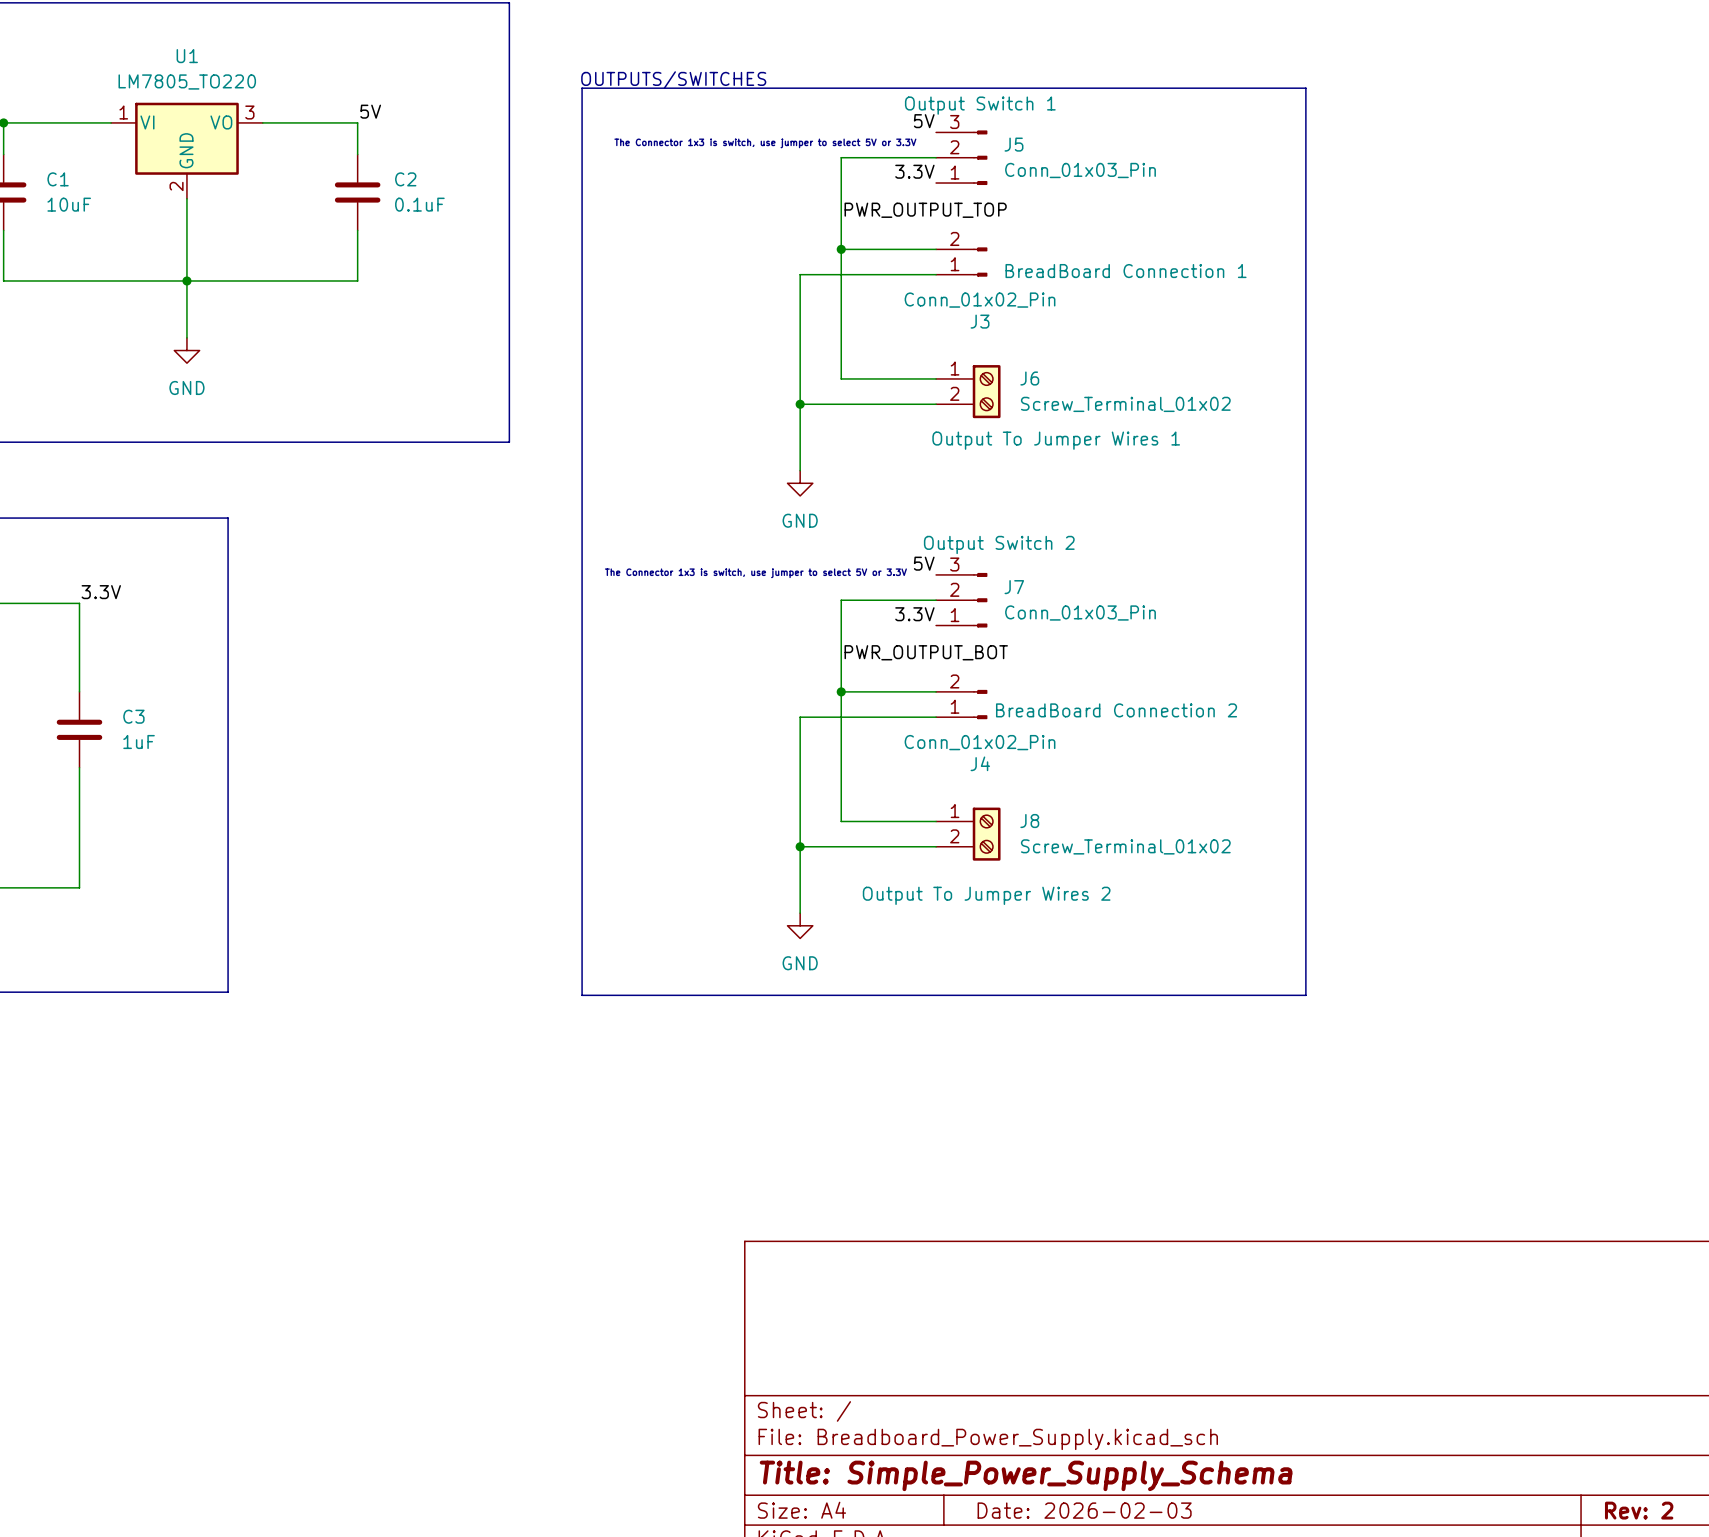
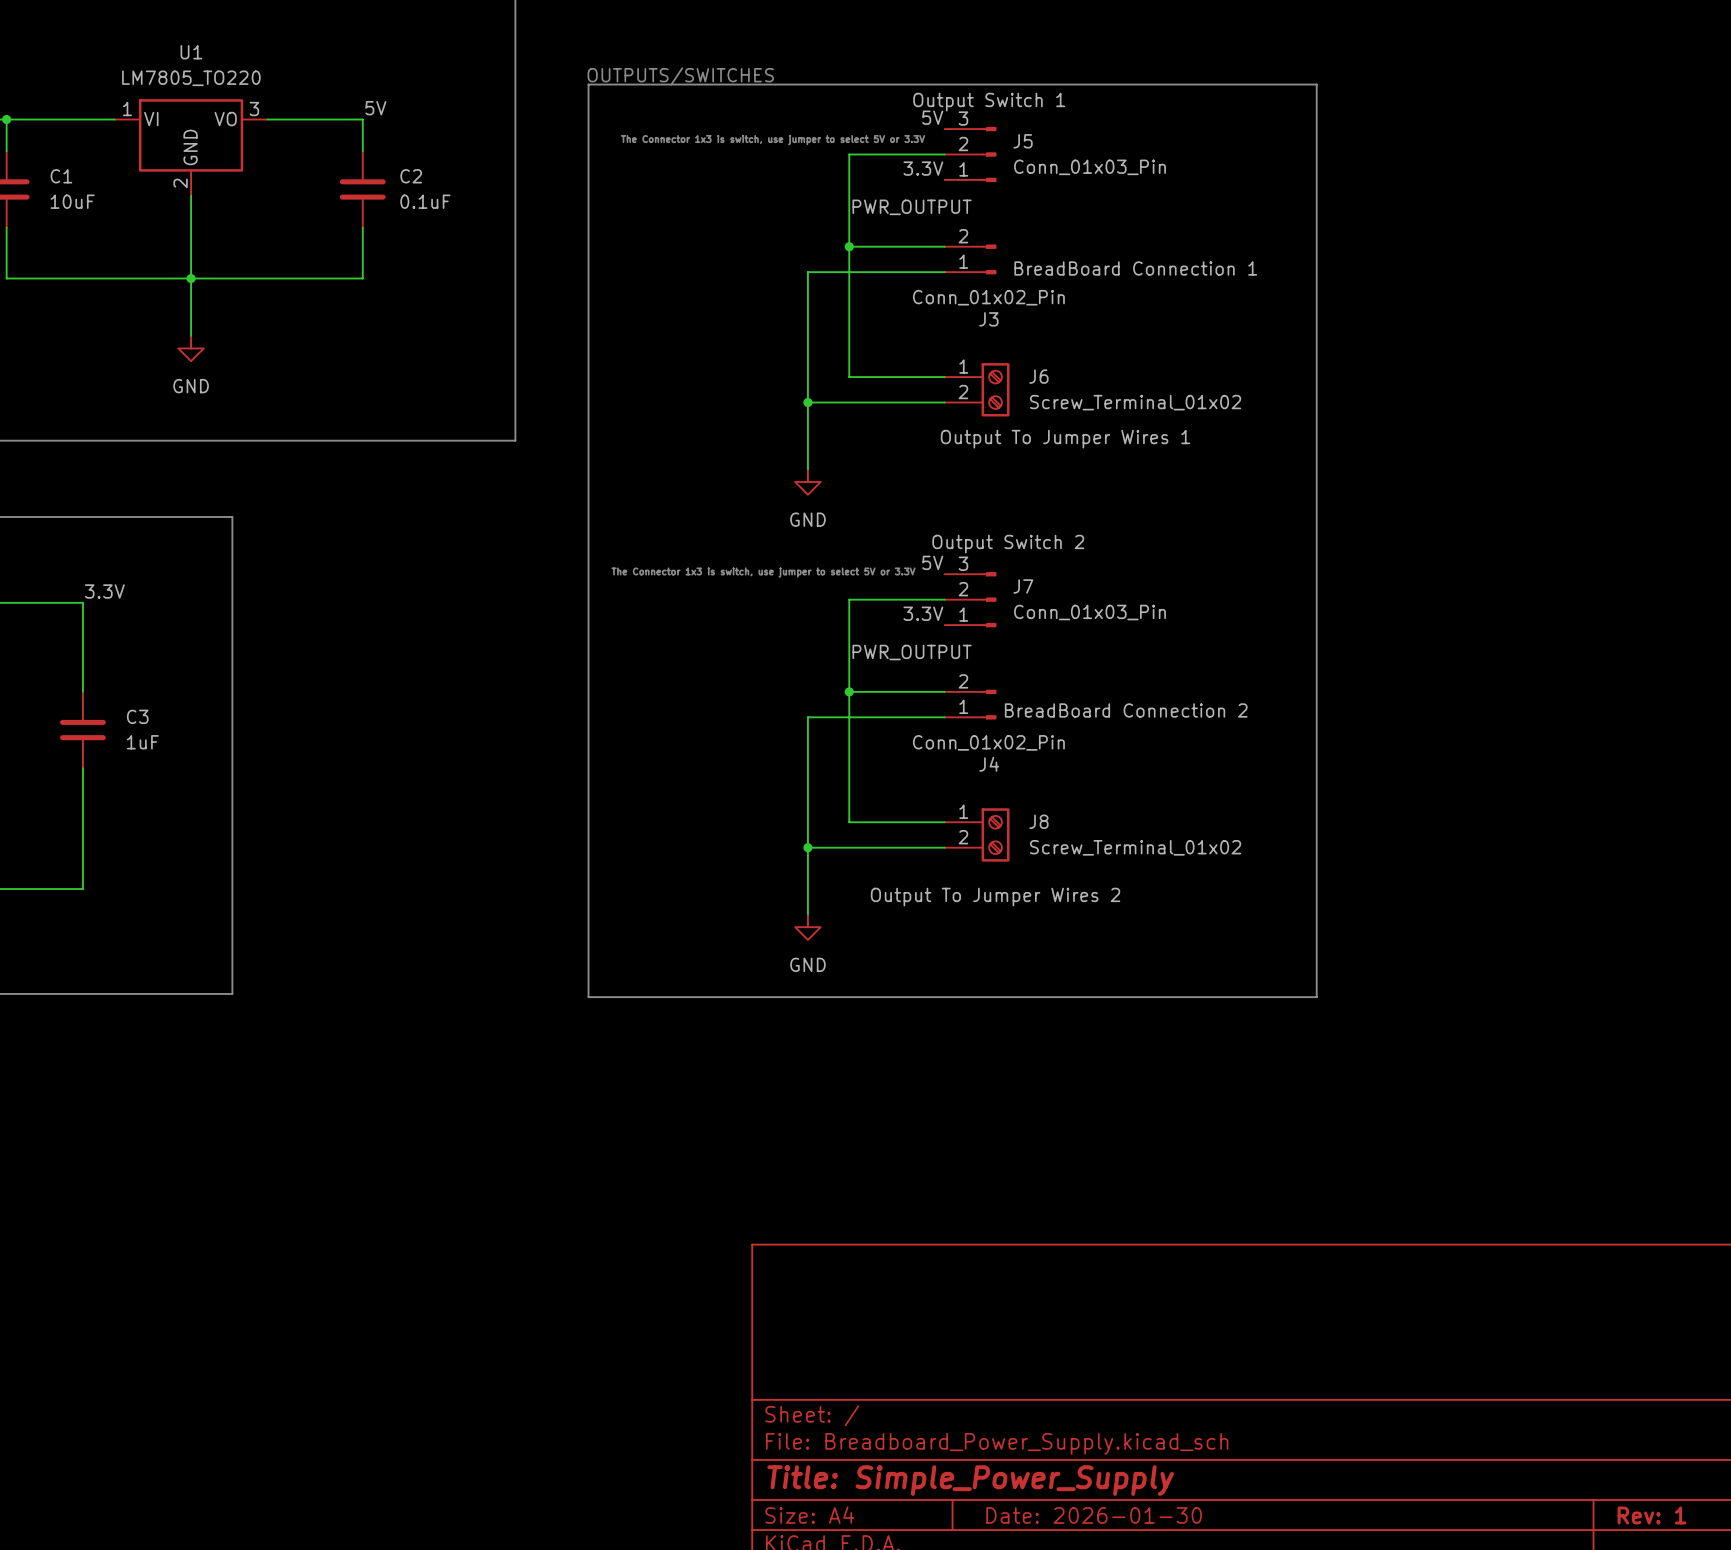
label: PWR_OUTPUT_TOP (925, 210) -> PWR_OUTPUT (912, 207)
label: PWR_OUTPUT_BOT (926, 652) -> PWR_OUTPUT (912, 652)
title block: Title: Simple_Power_Supply_Schema (1026, 1475) -> Title: Simple_Power_Supply (970, 1480)
title block: Date: 2026-02-03 (1084, 1510) -> Date: 2026-01-30 (1094, 1515)
title block: Rev: 2 (1639, 1510) -> Rev: 1 (1651, 1515)

